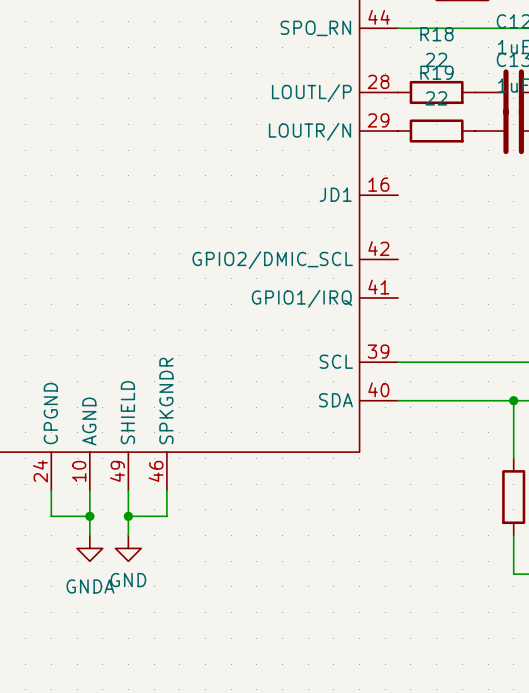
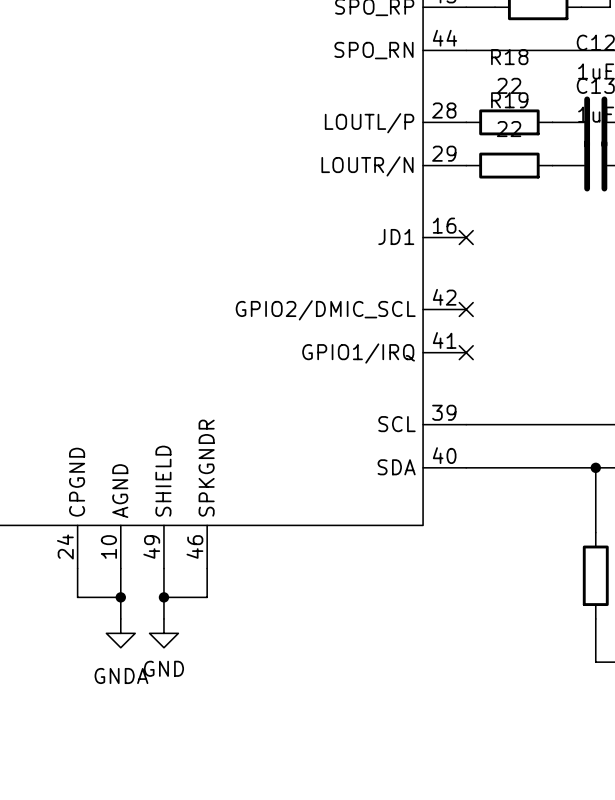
no-connect mark: none -> (466, 237)
no-connect mark: none -> (466, 309)
no-connect mark: none -> (466, 352)

